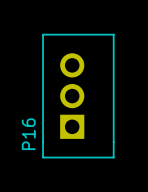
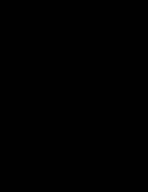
P16: (78, 96) -> none

